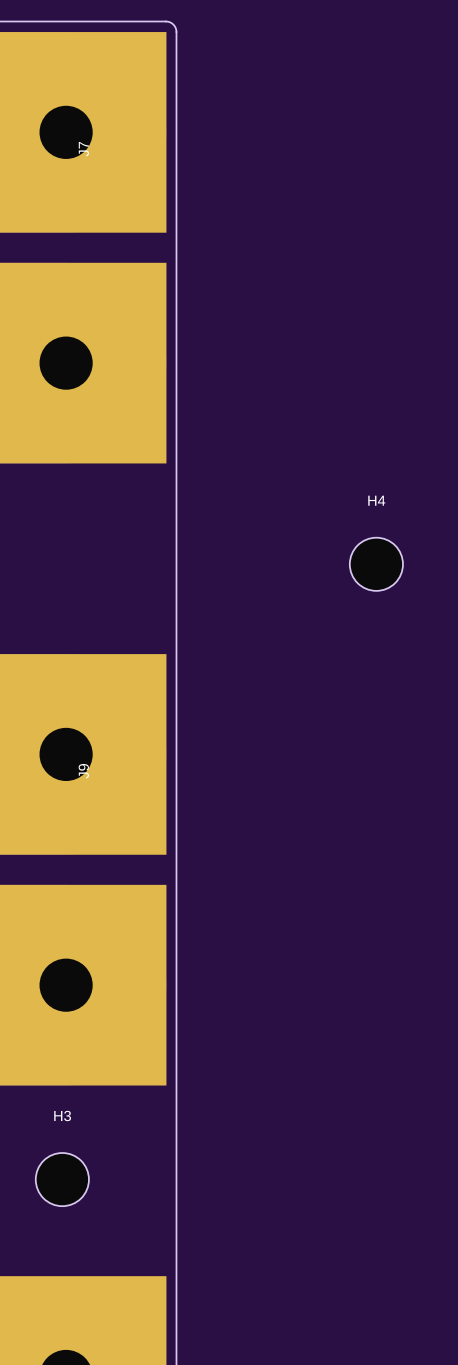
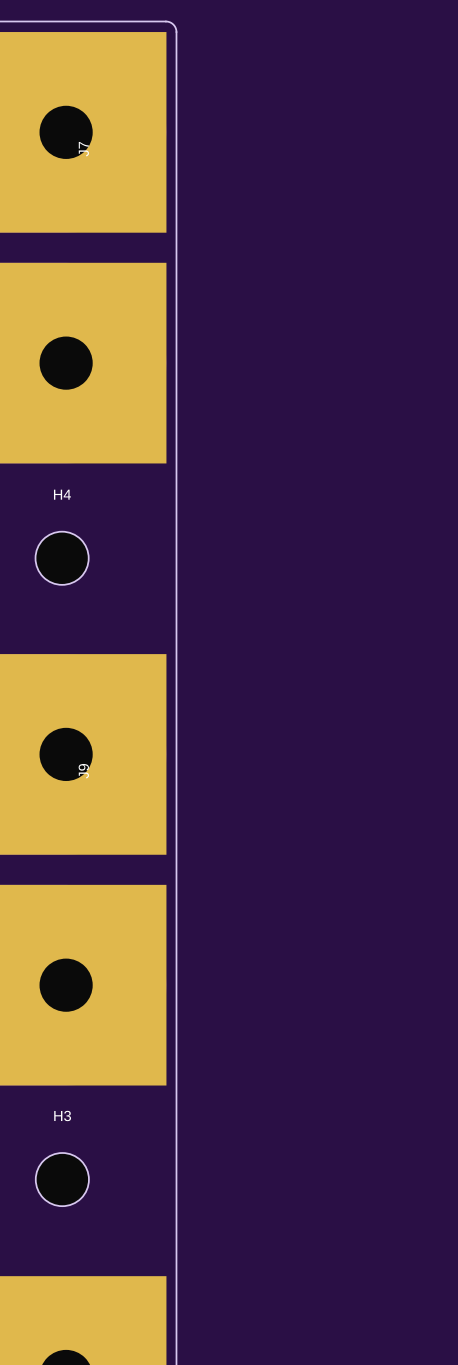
H4 position: (376, 564) -> (62, 558)

